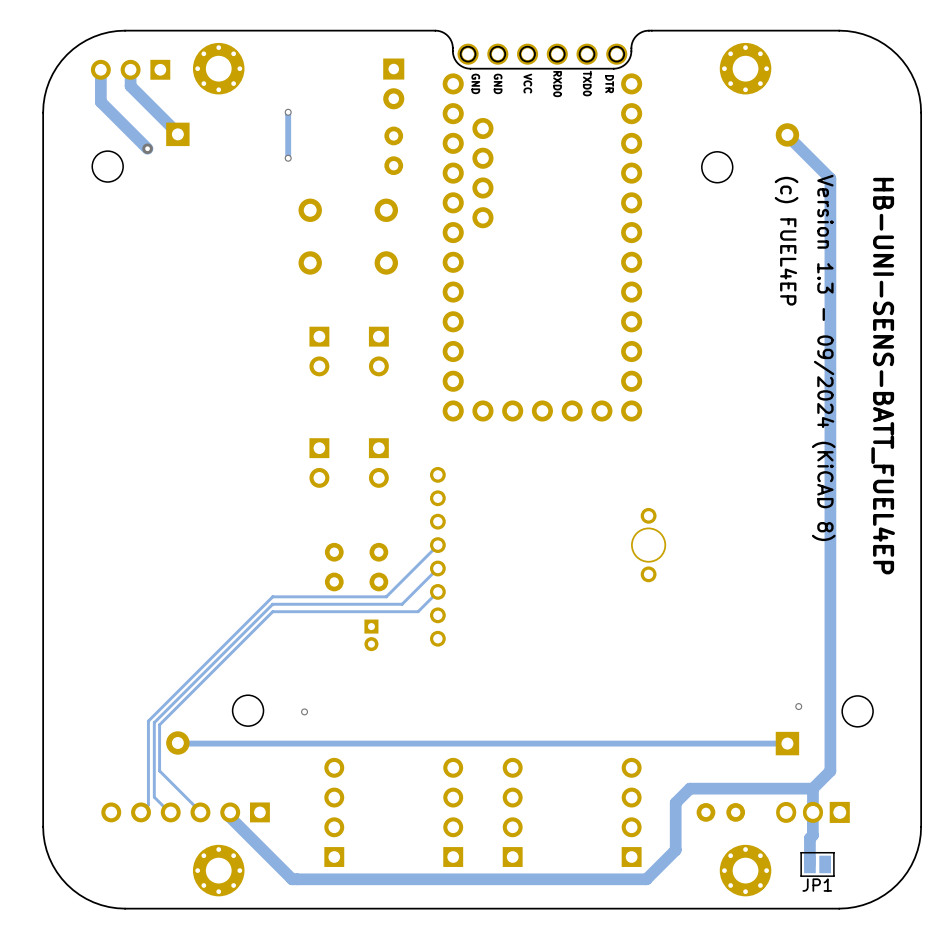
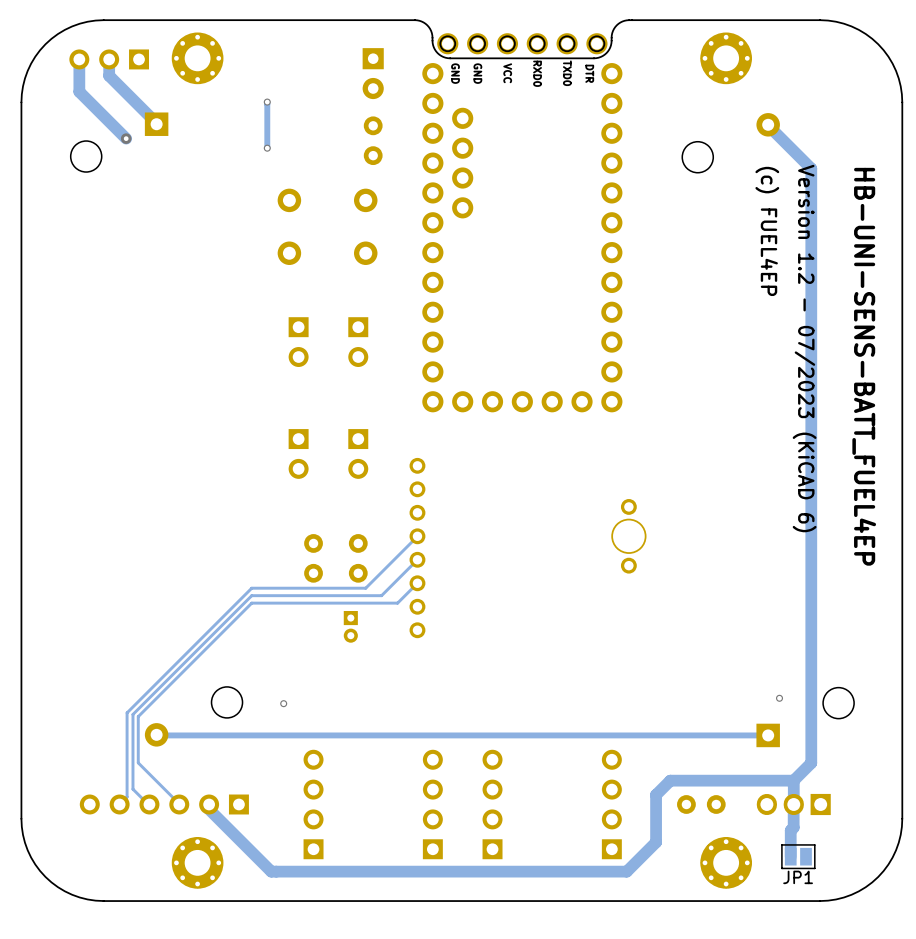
text: Version 1.3 - 09/2024 (KiCAD 8) (823, 357) -> Version 1.2 - 07/2023 (KiCAD 6) (804, 348)

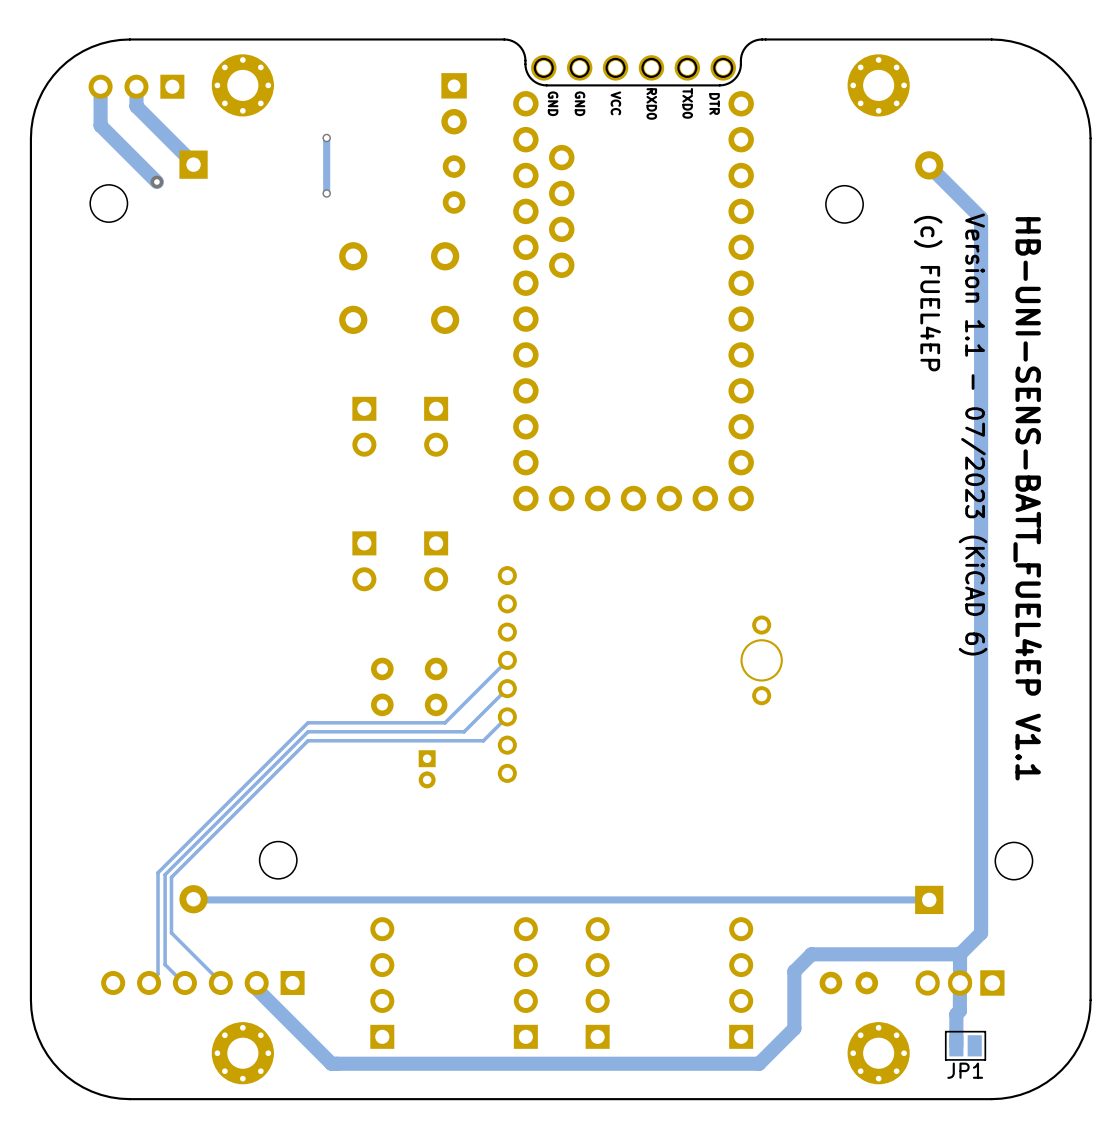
text: Version 1.2 - 07/2023 (KiCAD 6) (804, 348) -> Version 1.1 - 07/2023 (KiCAD 6) (973, 434)
text: HB-UNI-SENS-BATT_FUEL4EP (864, 366) -> HB-UNI-SENS-BATT_FUEL4EP V1.1 (1027, 498)
via: (779, 698) -> none
via: (283, 703) -> none

